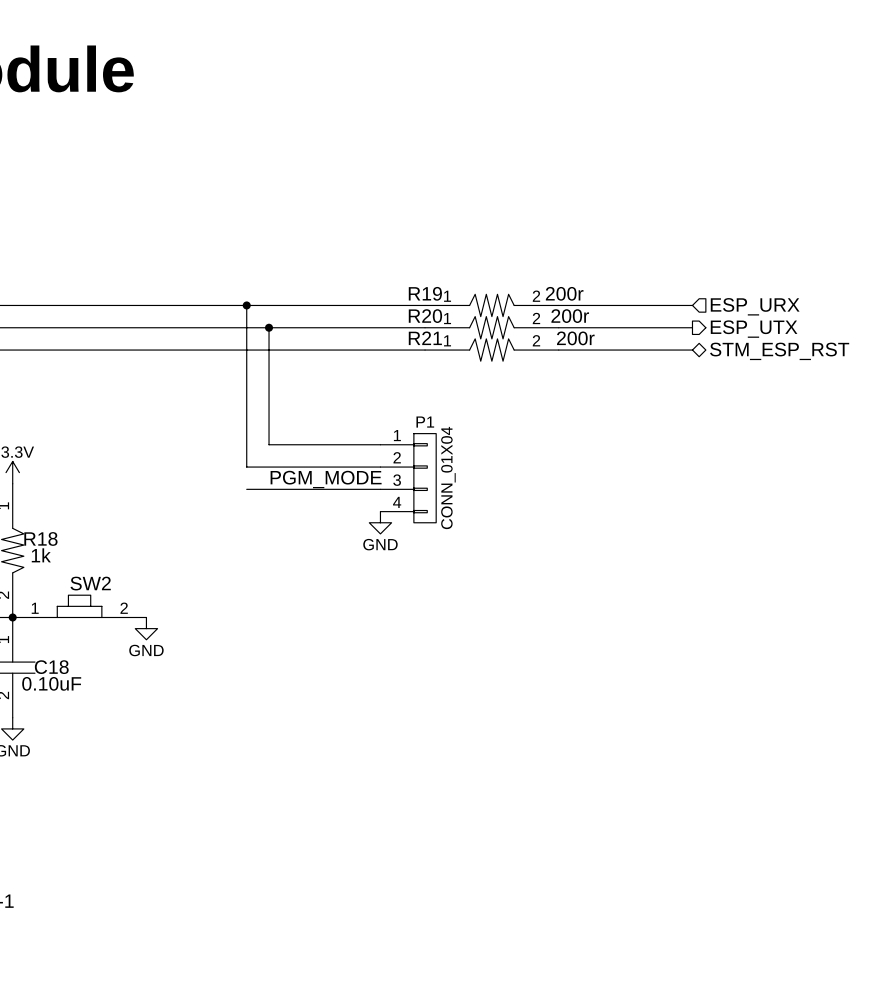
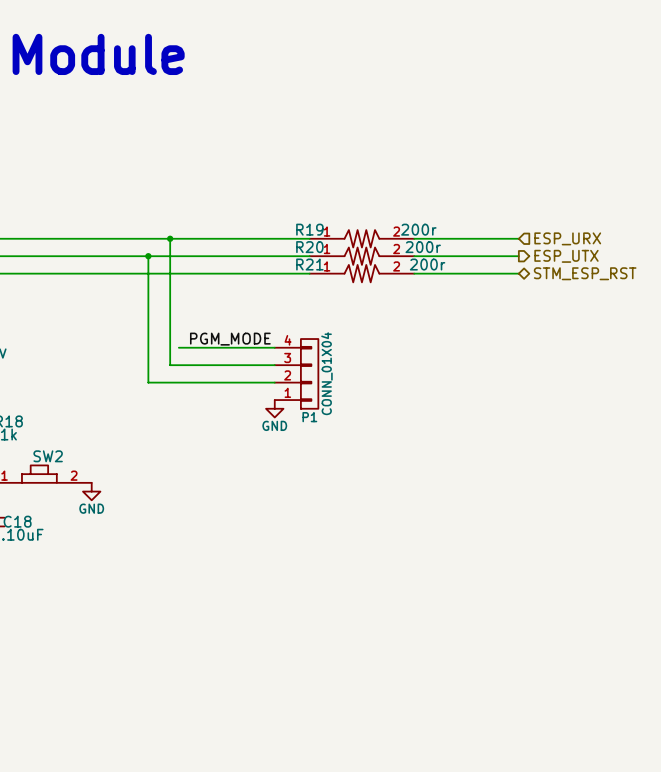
wire: none -> (148, 256) (148, 382) (170, 382)
wire: (269, 327) (269, 444) -> (178, 347) (187, 347)
junction position: (269, 327) -> (148, 256)
P1 flip: as is (425, 478) -> up-down (309, 373)
label position: PGM_MODE (326, 479) -> PGM_MODE (230, 339)

